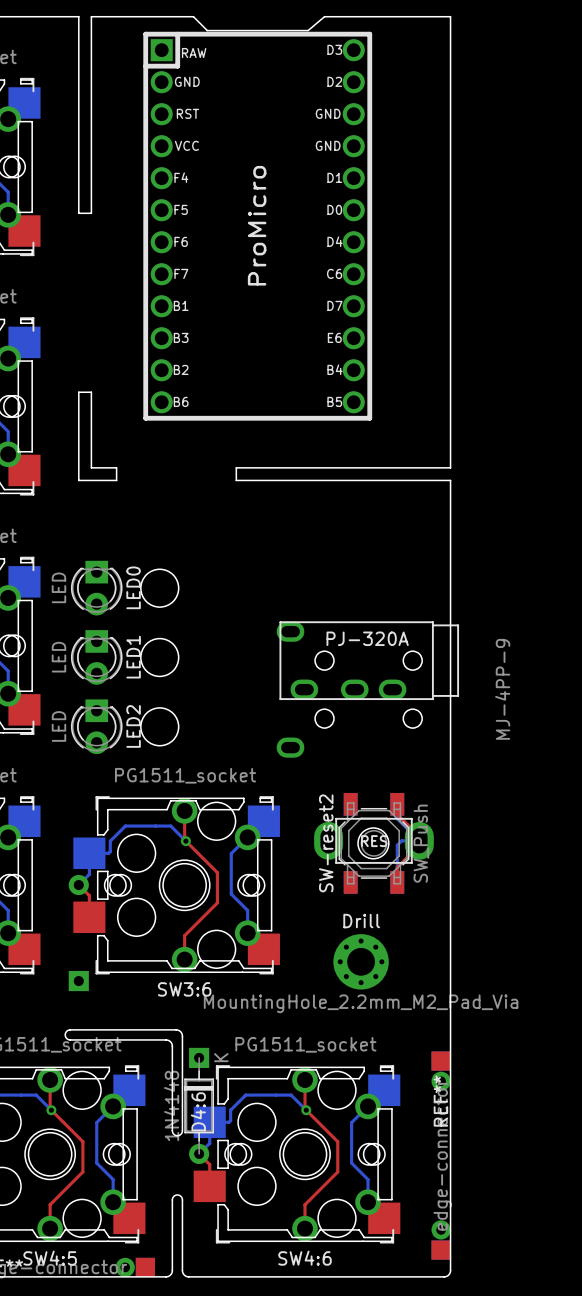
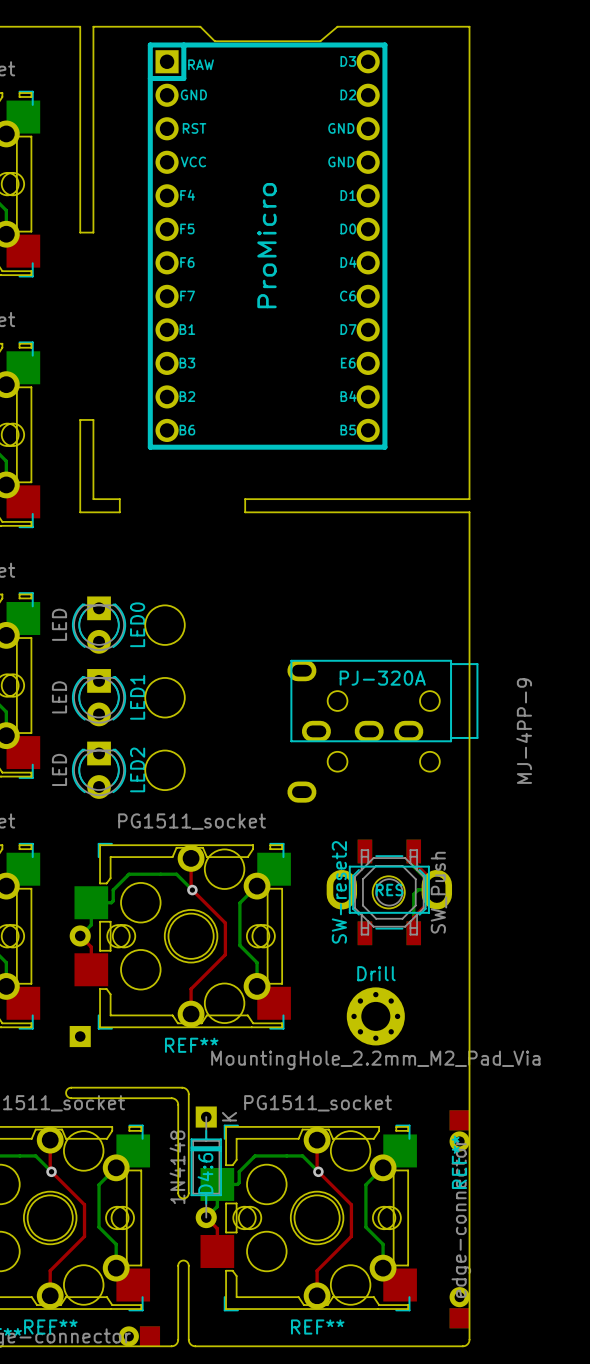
REF** name: SW3:6 (184, 989) -> REF** (191, 1045)
REF** name: SW4:5 (50, 1258) -> REF** (50, 1327)
REF** name: SW4:6 (304, 1258) -> REF** (317, 1327)

